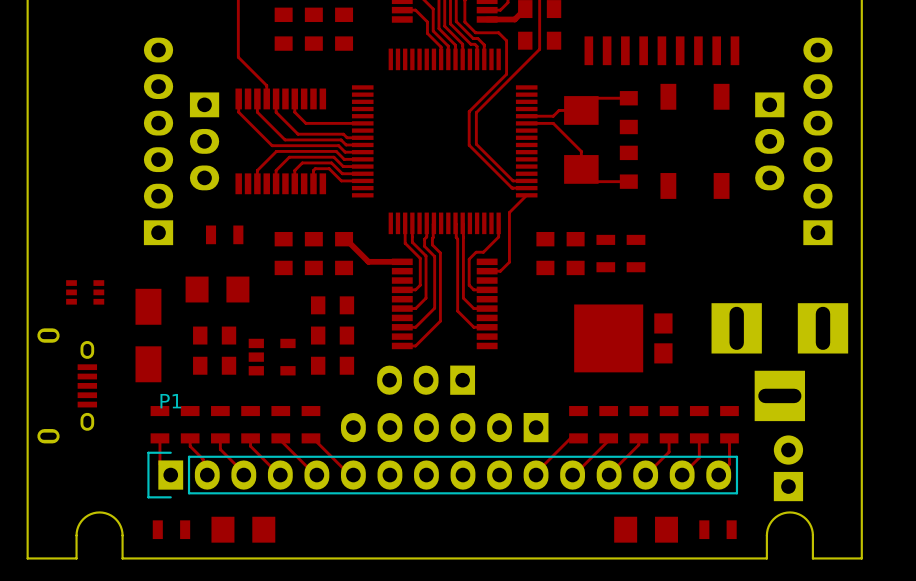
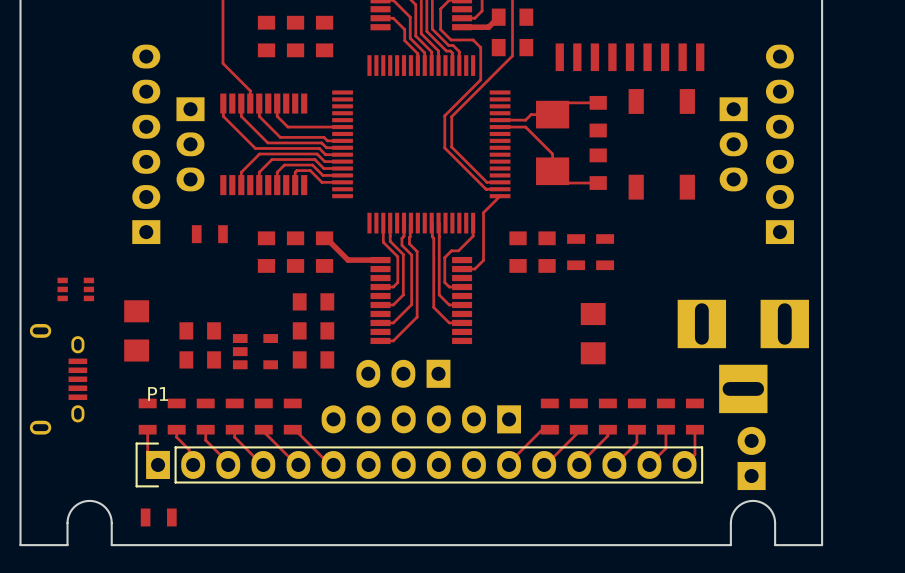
part footprint: [135, 288, 162, 383] -> [124, 300, 150, 362]
part: (217, 289) -> none
part footprint: [574, 304, 673, 373] -> [580, 303, 606, 365]
part: (243, 529) -> none
part: (646, 529) -> none
part: (717, 529) -> none

